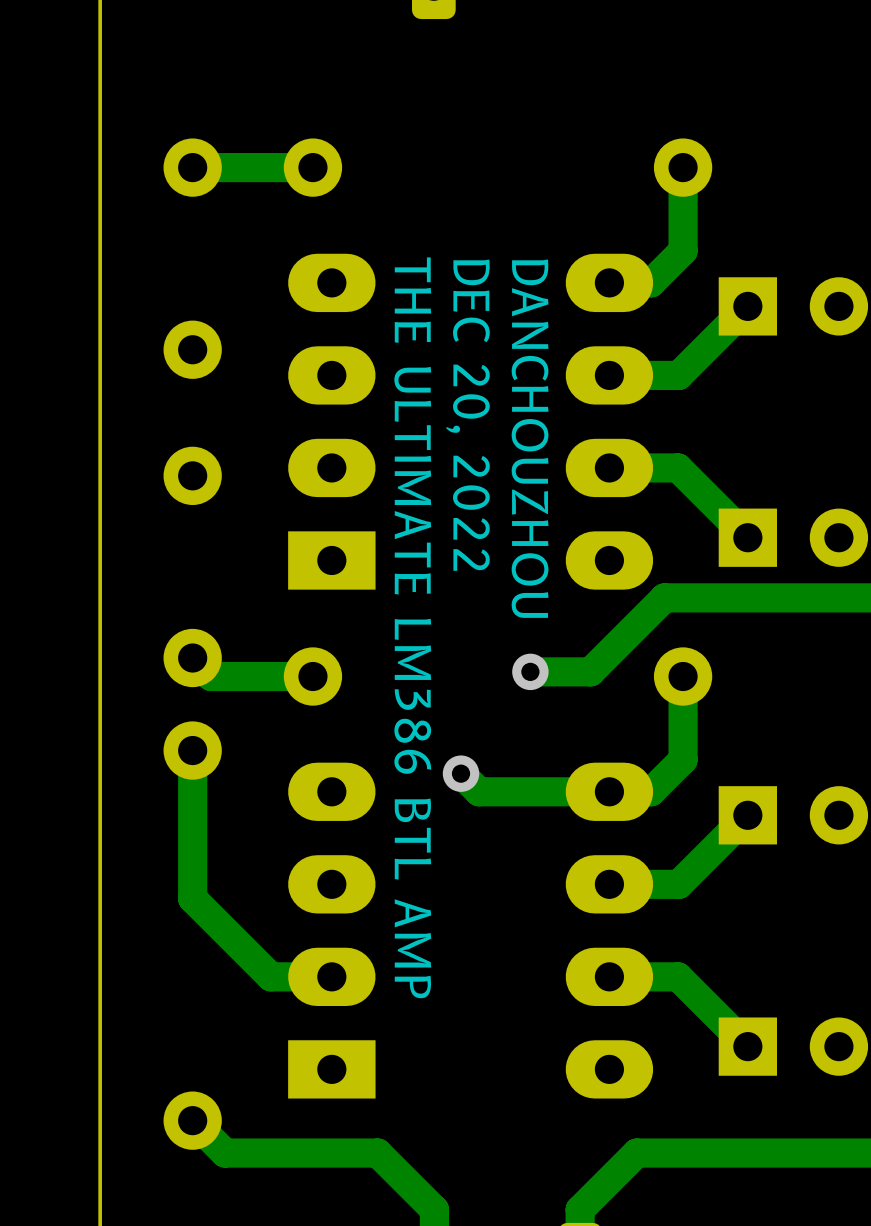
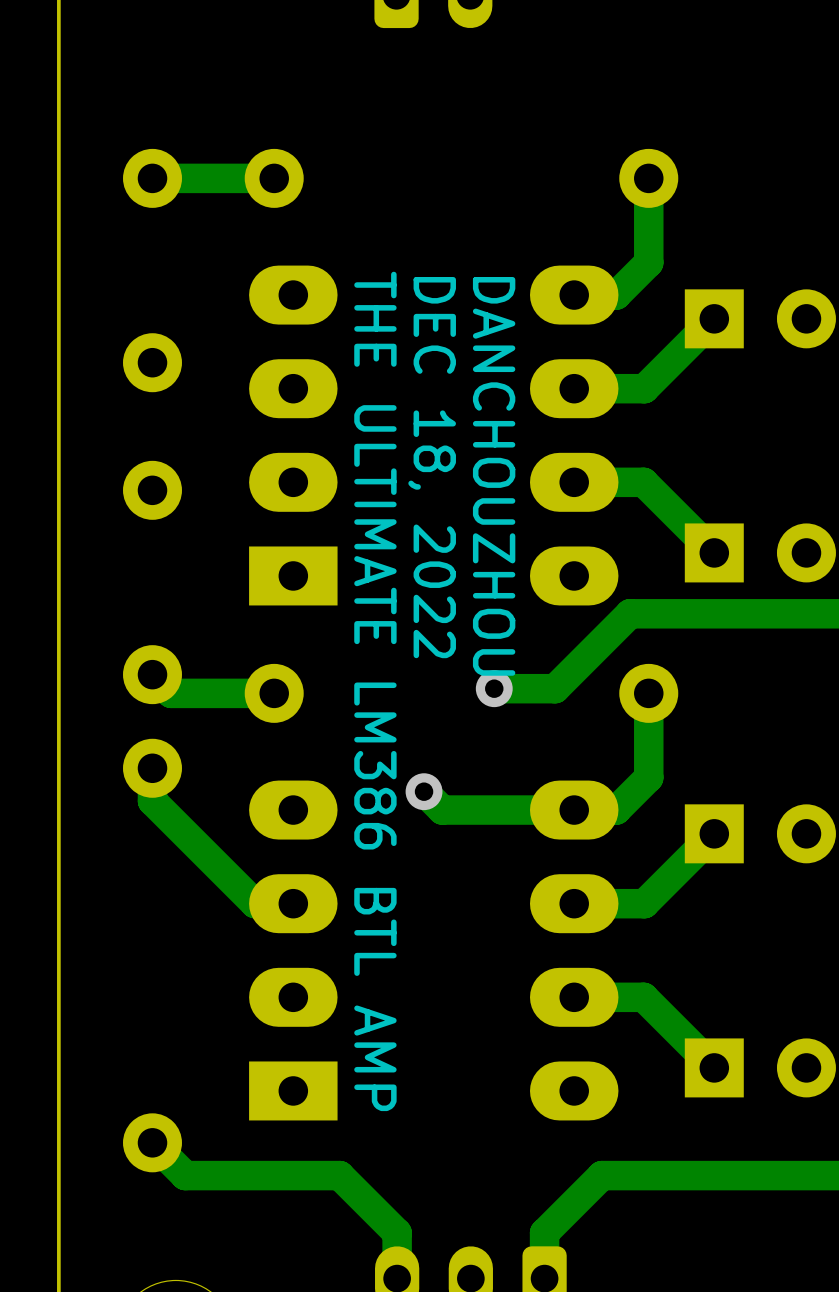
text: DEC 20, 2022 (467, 415) -> DEC 18, 2022 (432, 467)
track: (192, 782) (192, 898) (270, 976) (331, 976) -> (152, 801) (255, 903) (293, 903)

